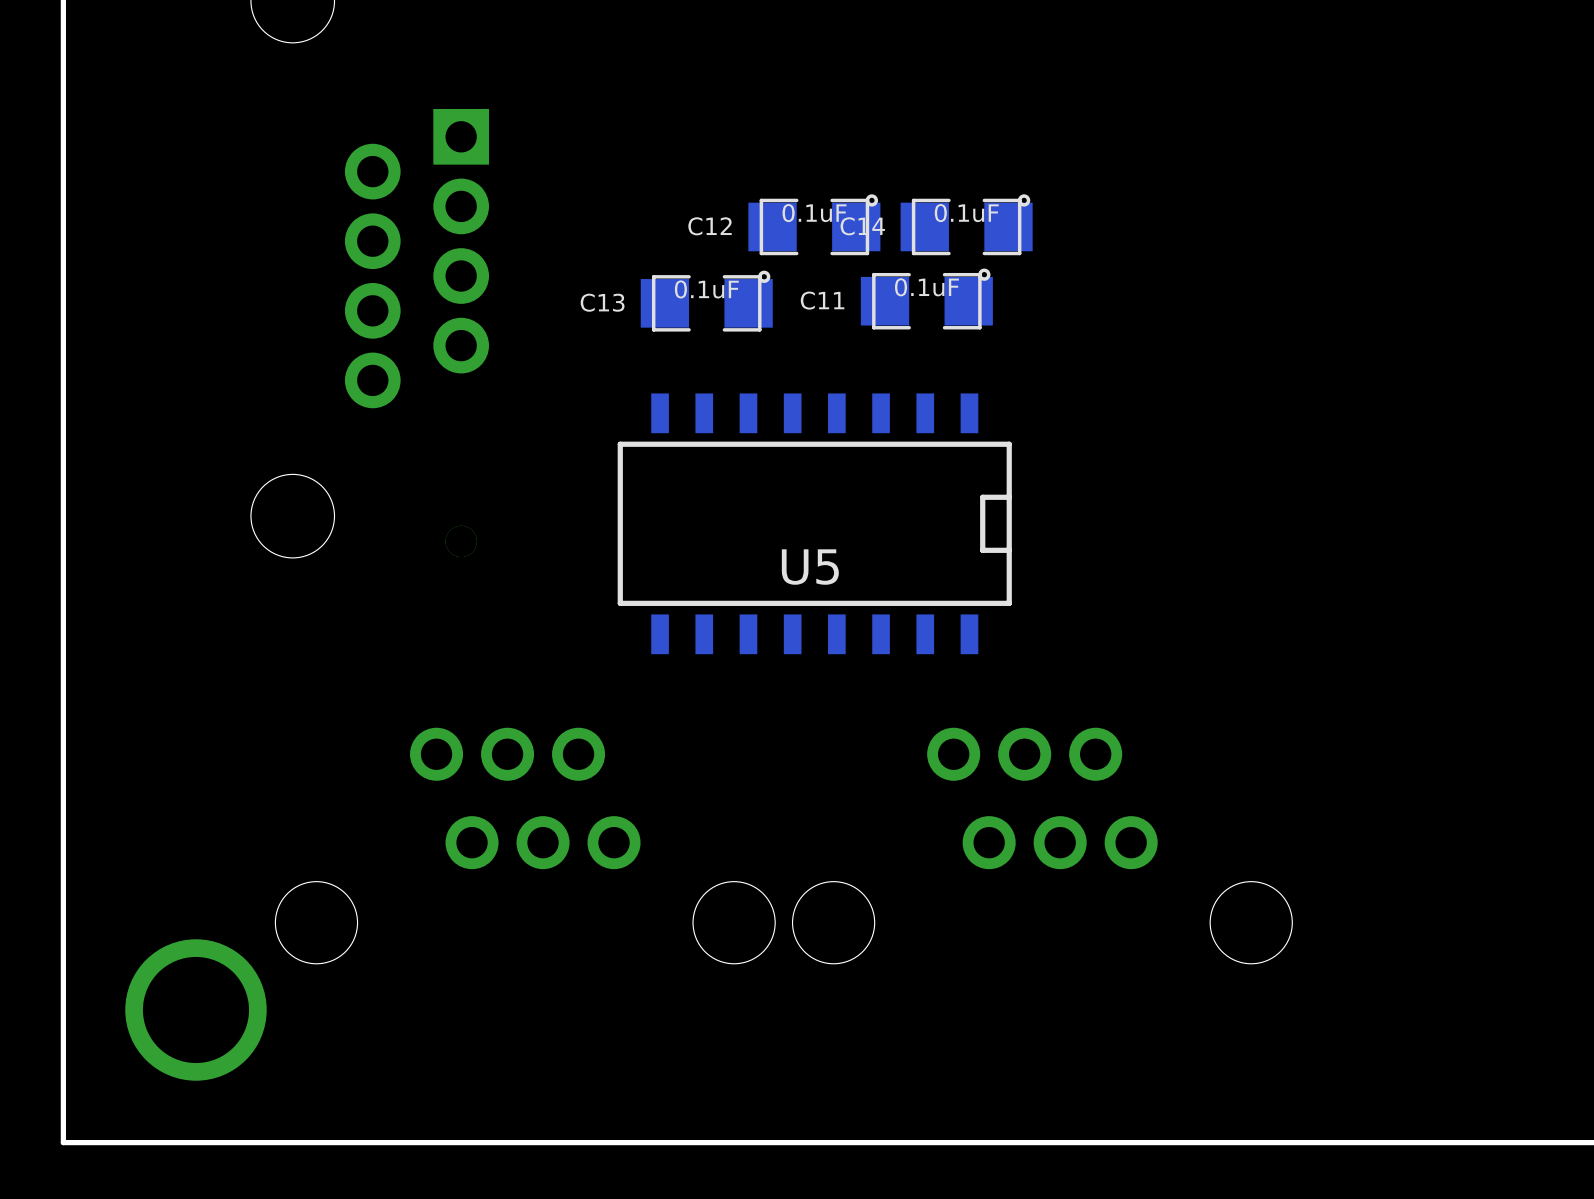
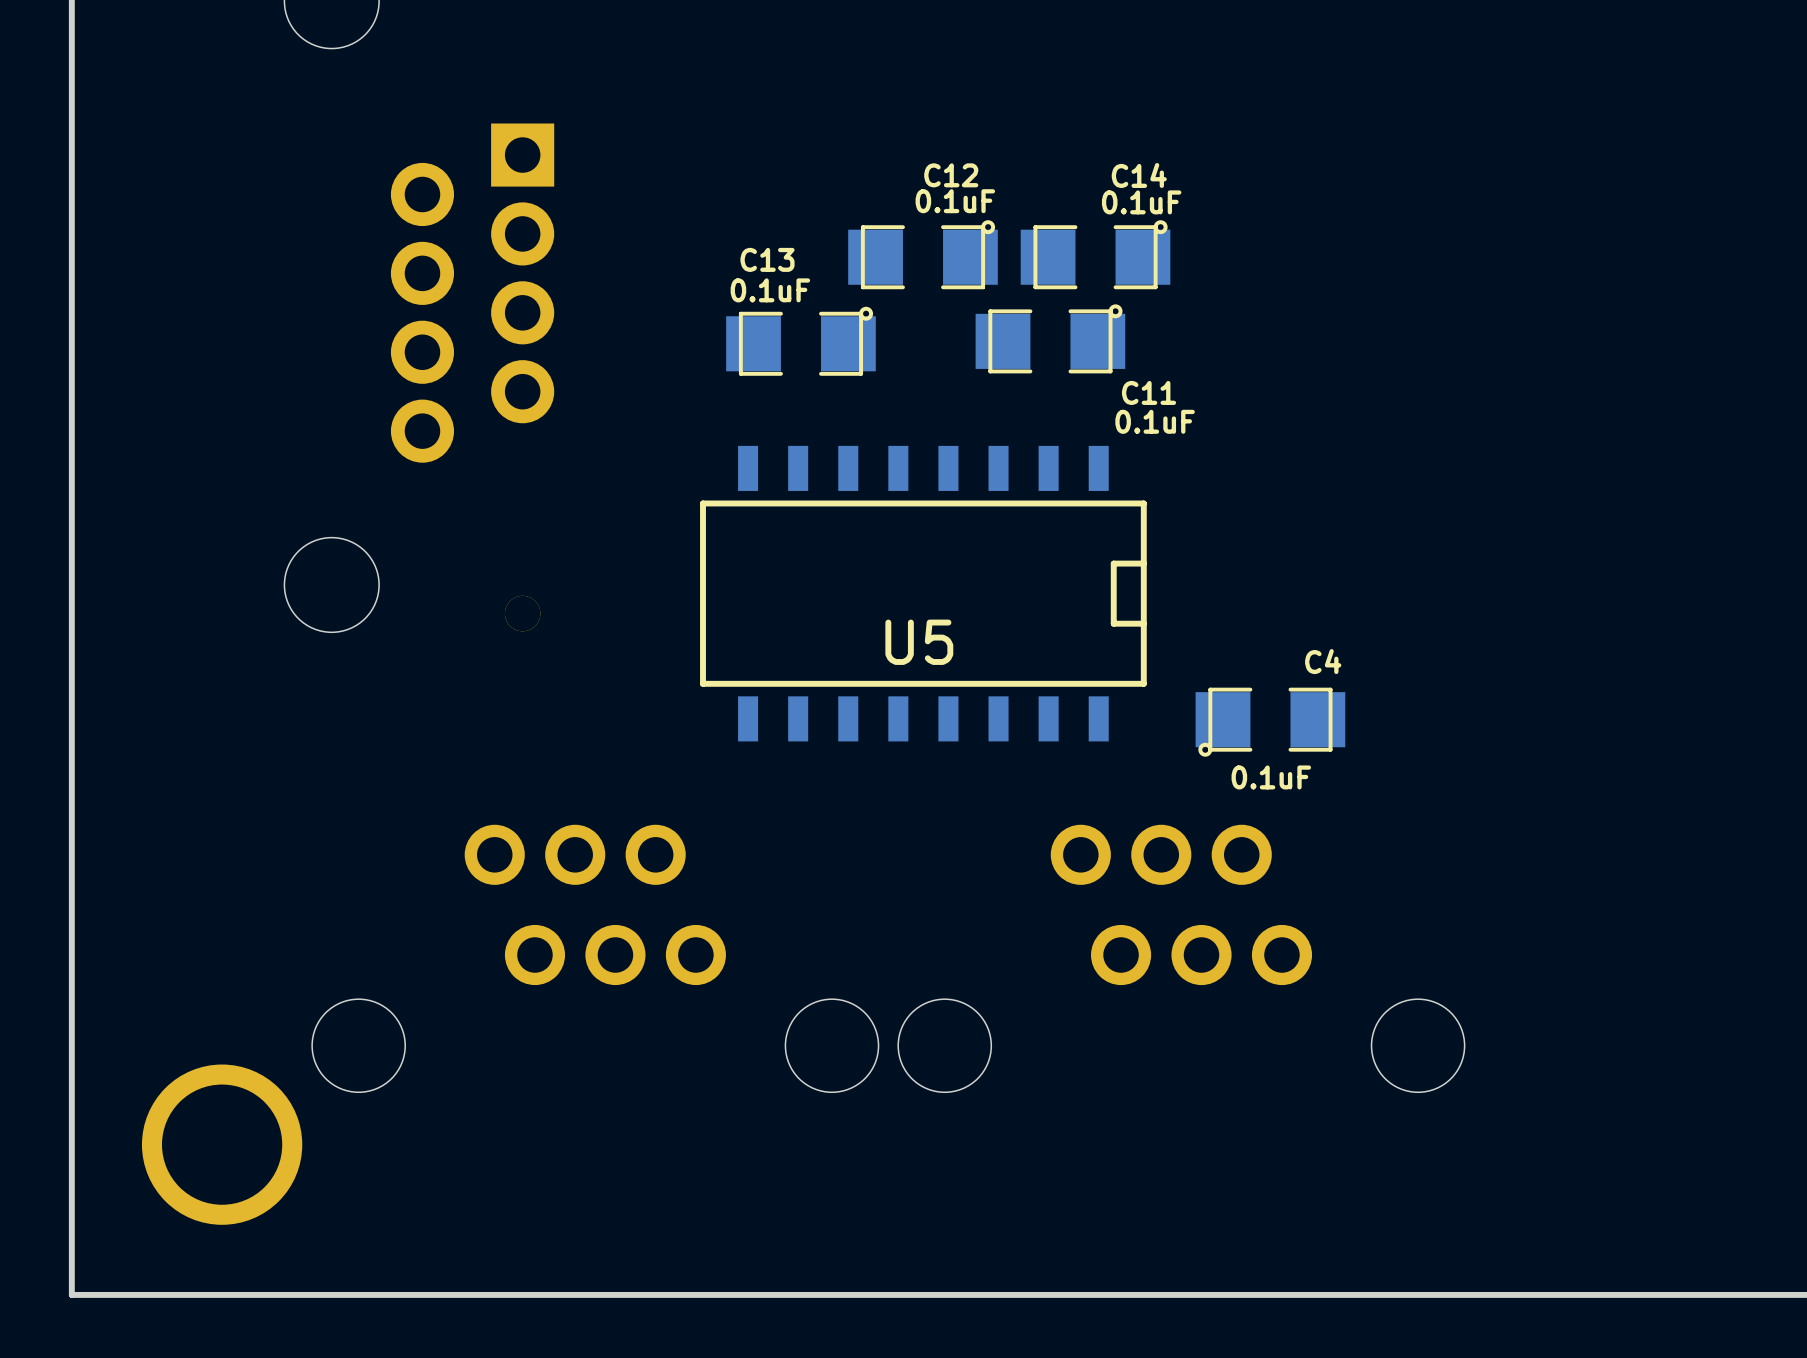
C12 value position: 0.1uF (814, 213) -> 0.1uF (955, 201)
C14 value position: 0.1uF (966, 213) -> 0.1uF (1141, 202)
C12 name position: C12 (710, 226) -> C12 (951, 175)
C14 name position: C14 (862, 226) -> C14 (1139, 175)
C11 value position: 0.1uF (926, 287) -> 0.1uF (1155, 421)
C13 value position: 0.1uF (706, 289) -> 0.1uF (770, 290)
C11 name position: C11 (822, 300) -> C11 (1149, 392)
C13 name position: C13 (602, 302) -> C13 (767, 259)
C4: none -> 0.1uF (1270, 722)

